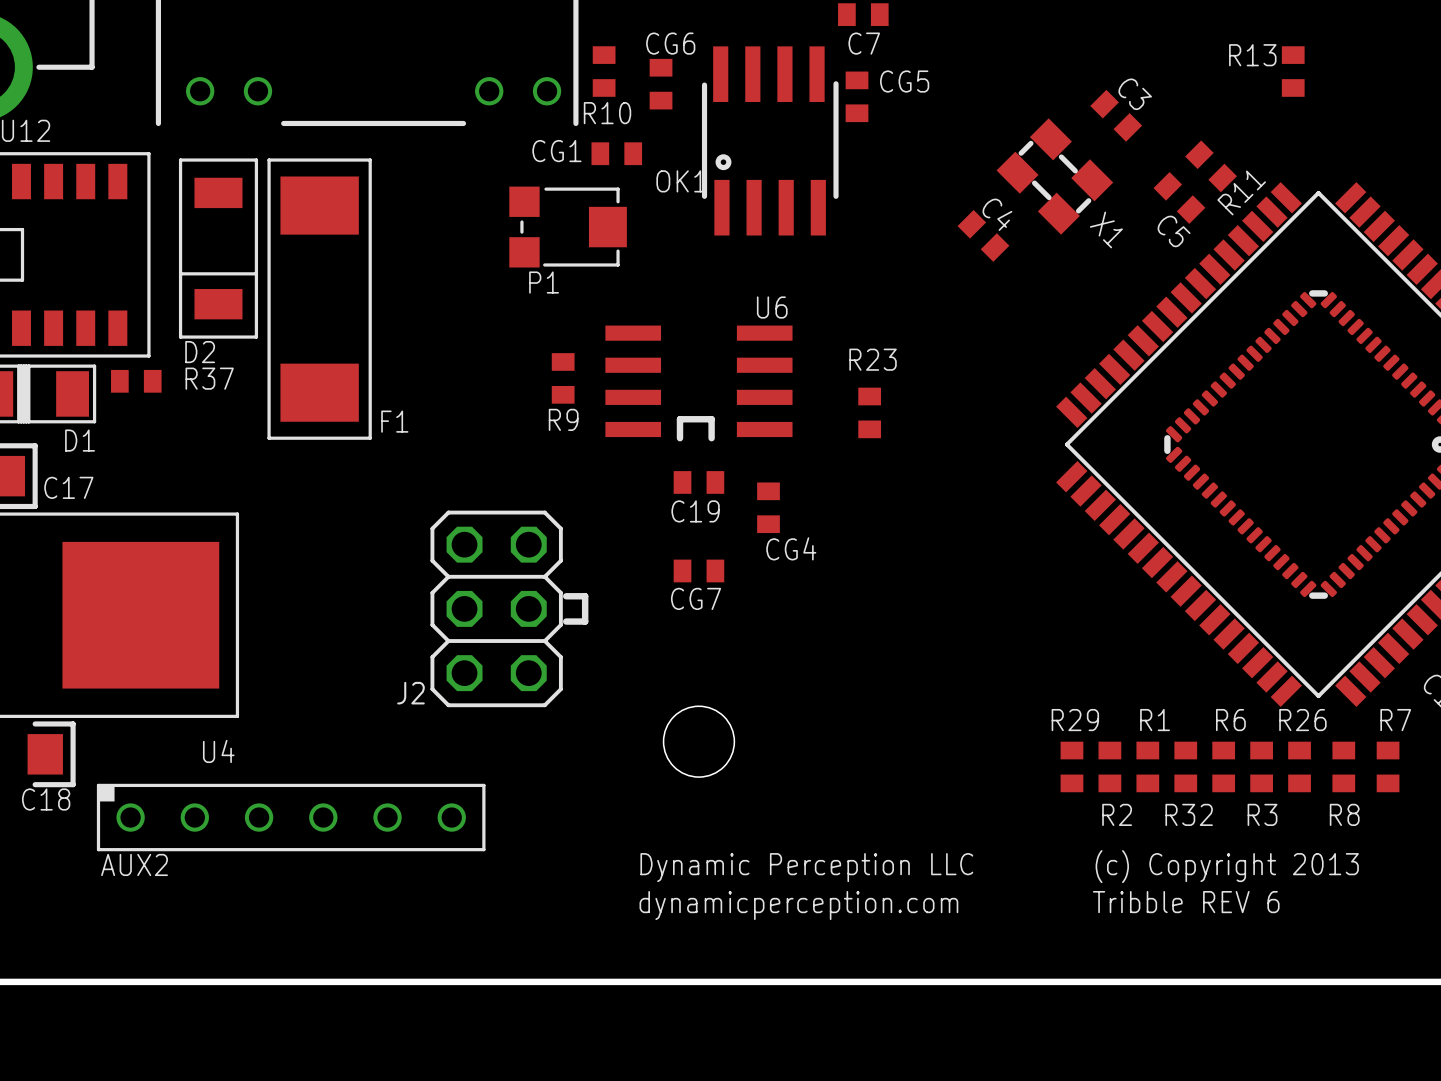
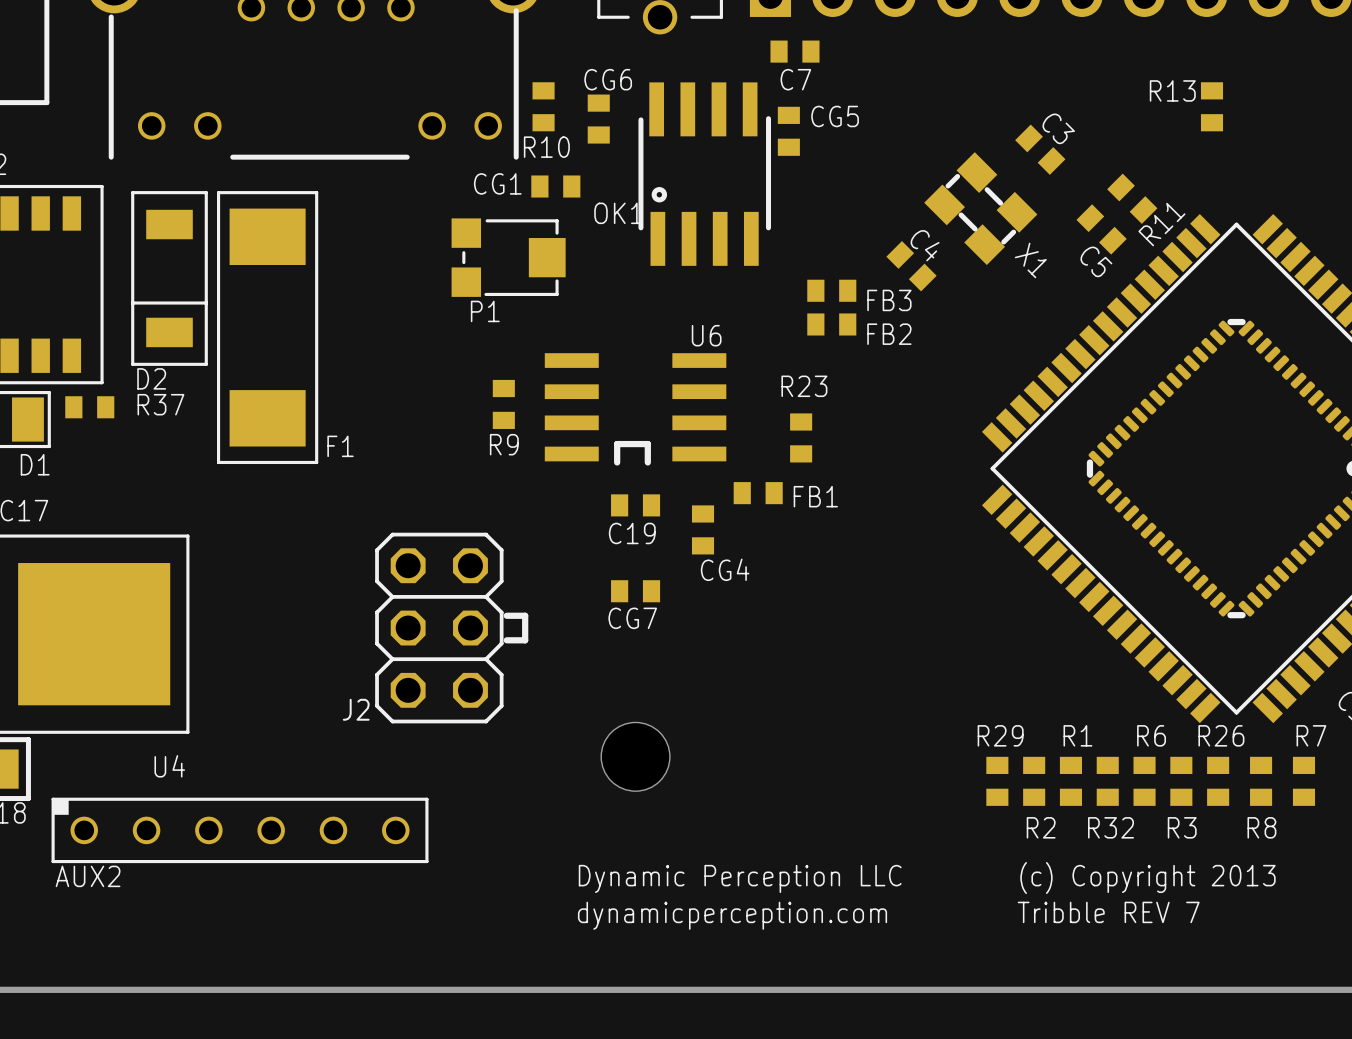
FB3: none -> (831, 290)
FB2: none -> (831, 324)
FB1: none -> (758, 493)
text: Tribble REV 6 (1186, 902) -> Tribble REV 7 (1108, 912)

